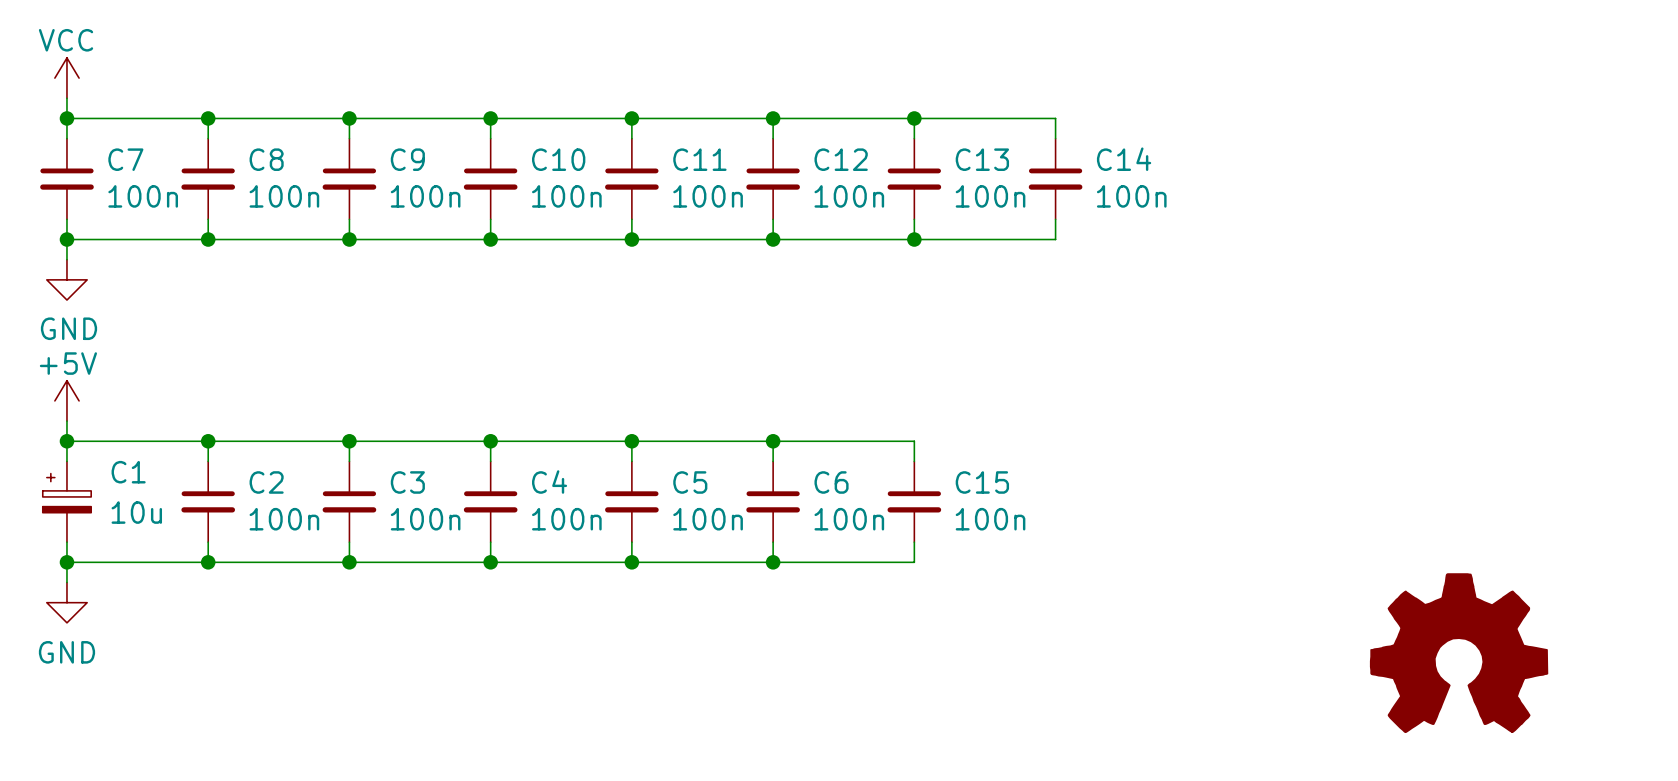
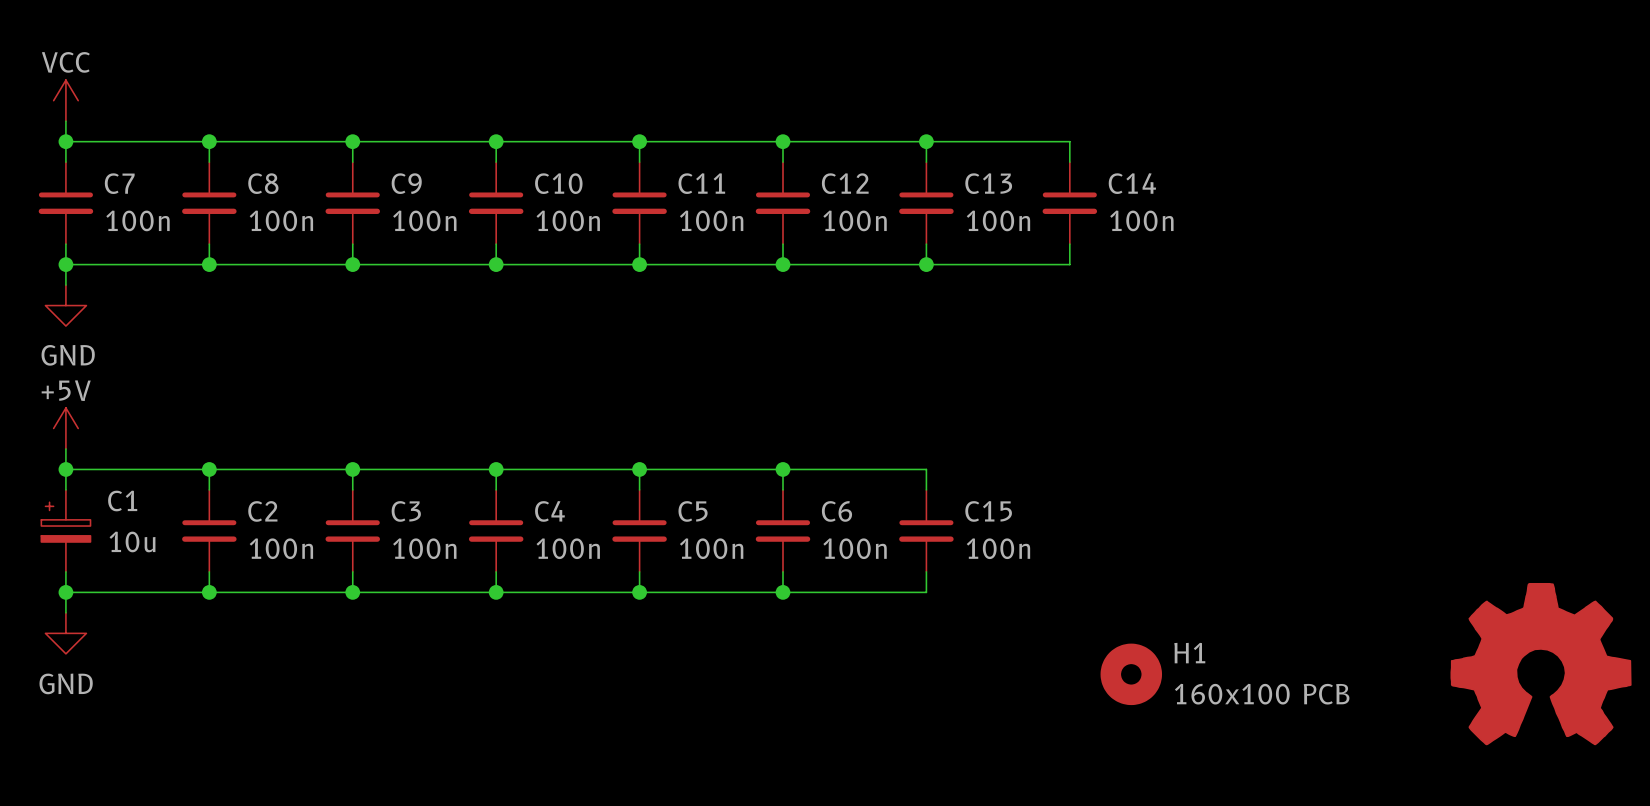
H1: none -> 160x100 PCB (1131, 674)
power symbol position: (1459, 653) -> (1541, 664)

